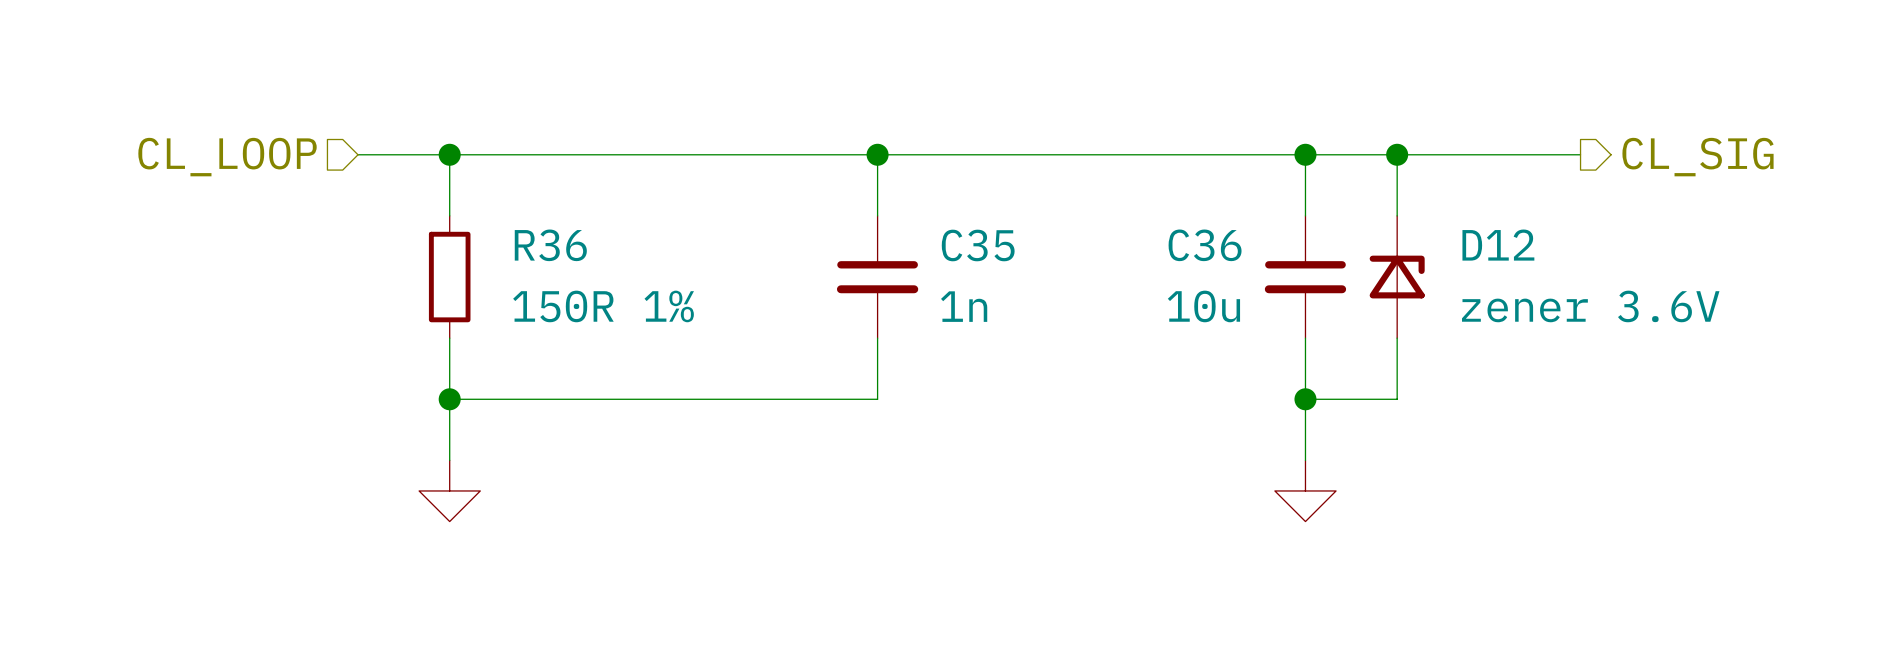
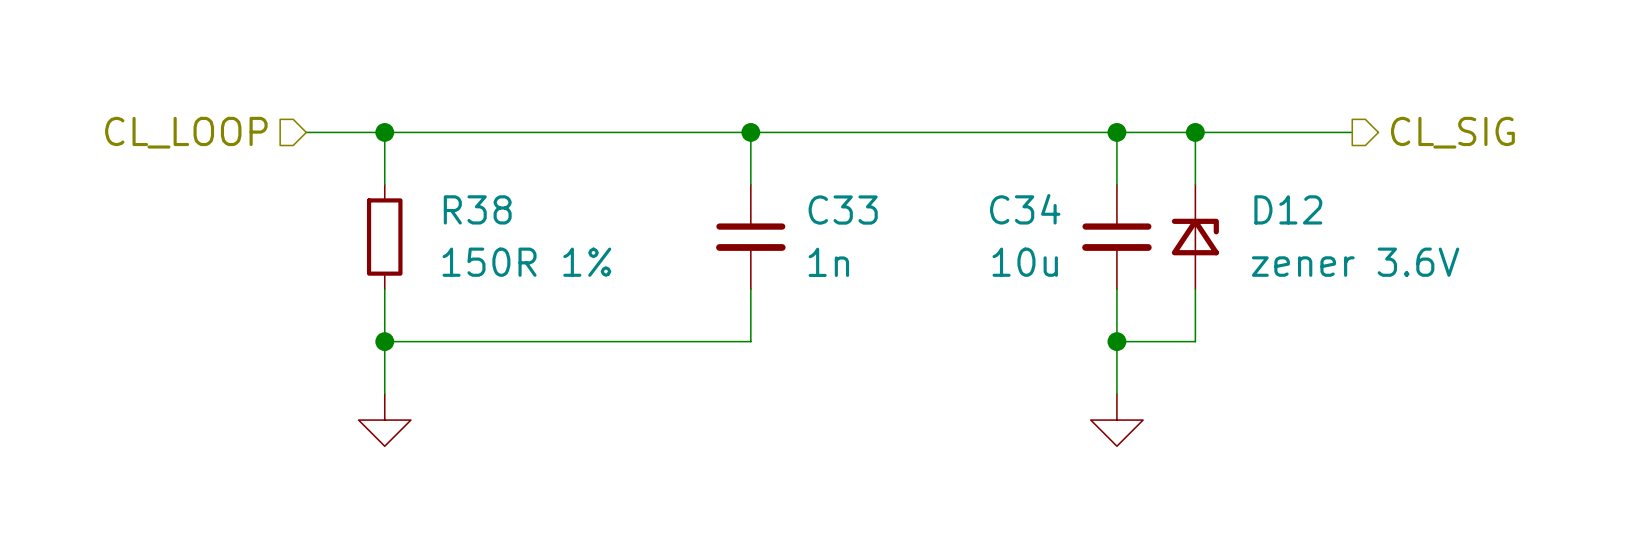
R36 name: R36 (550, 245) -> R38 (477, 209)
C35 name: C35 (978, 245) -> C33 (843, 210)
C36 name: C36 (1205, 245) -> C34 (1025, 209)

